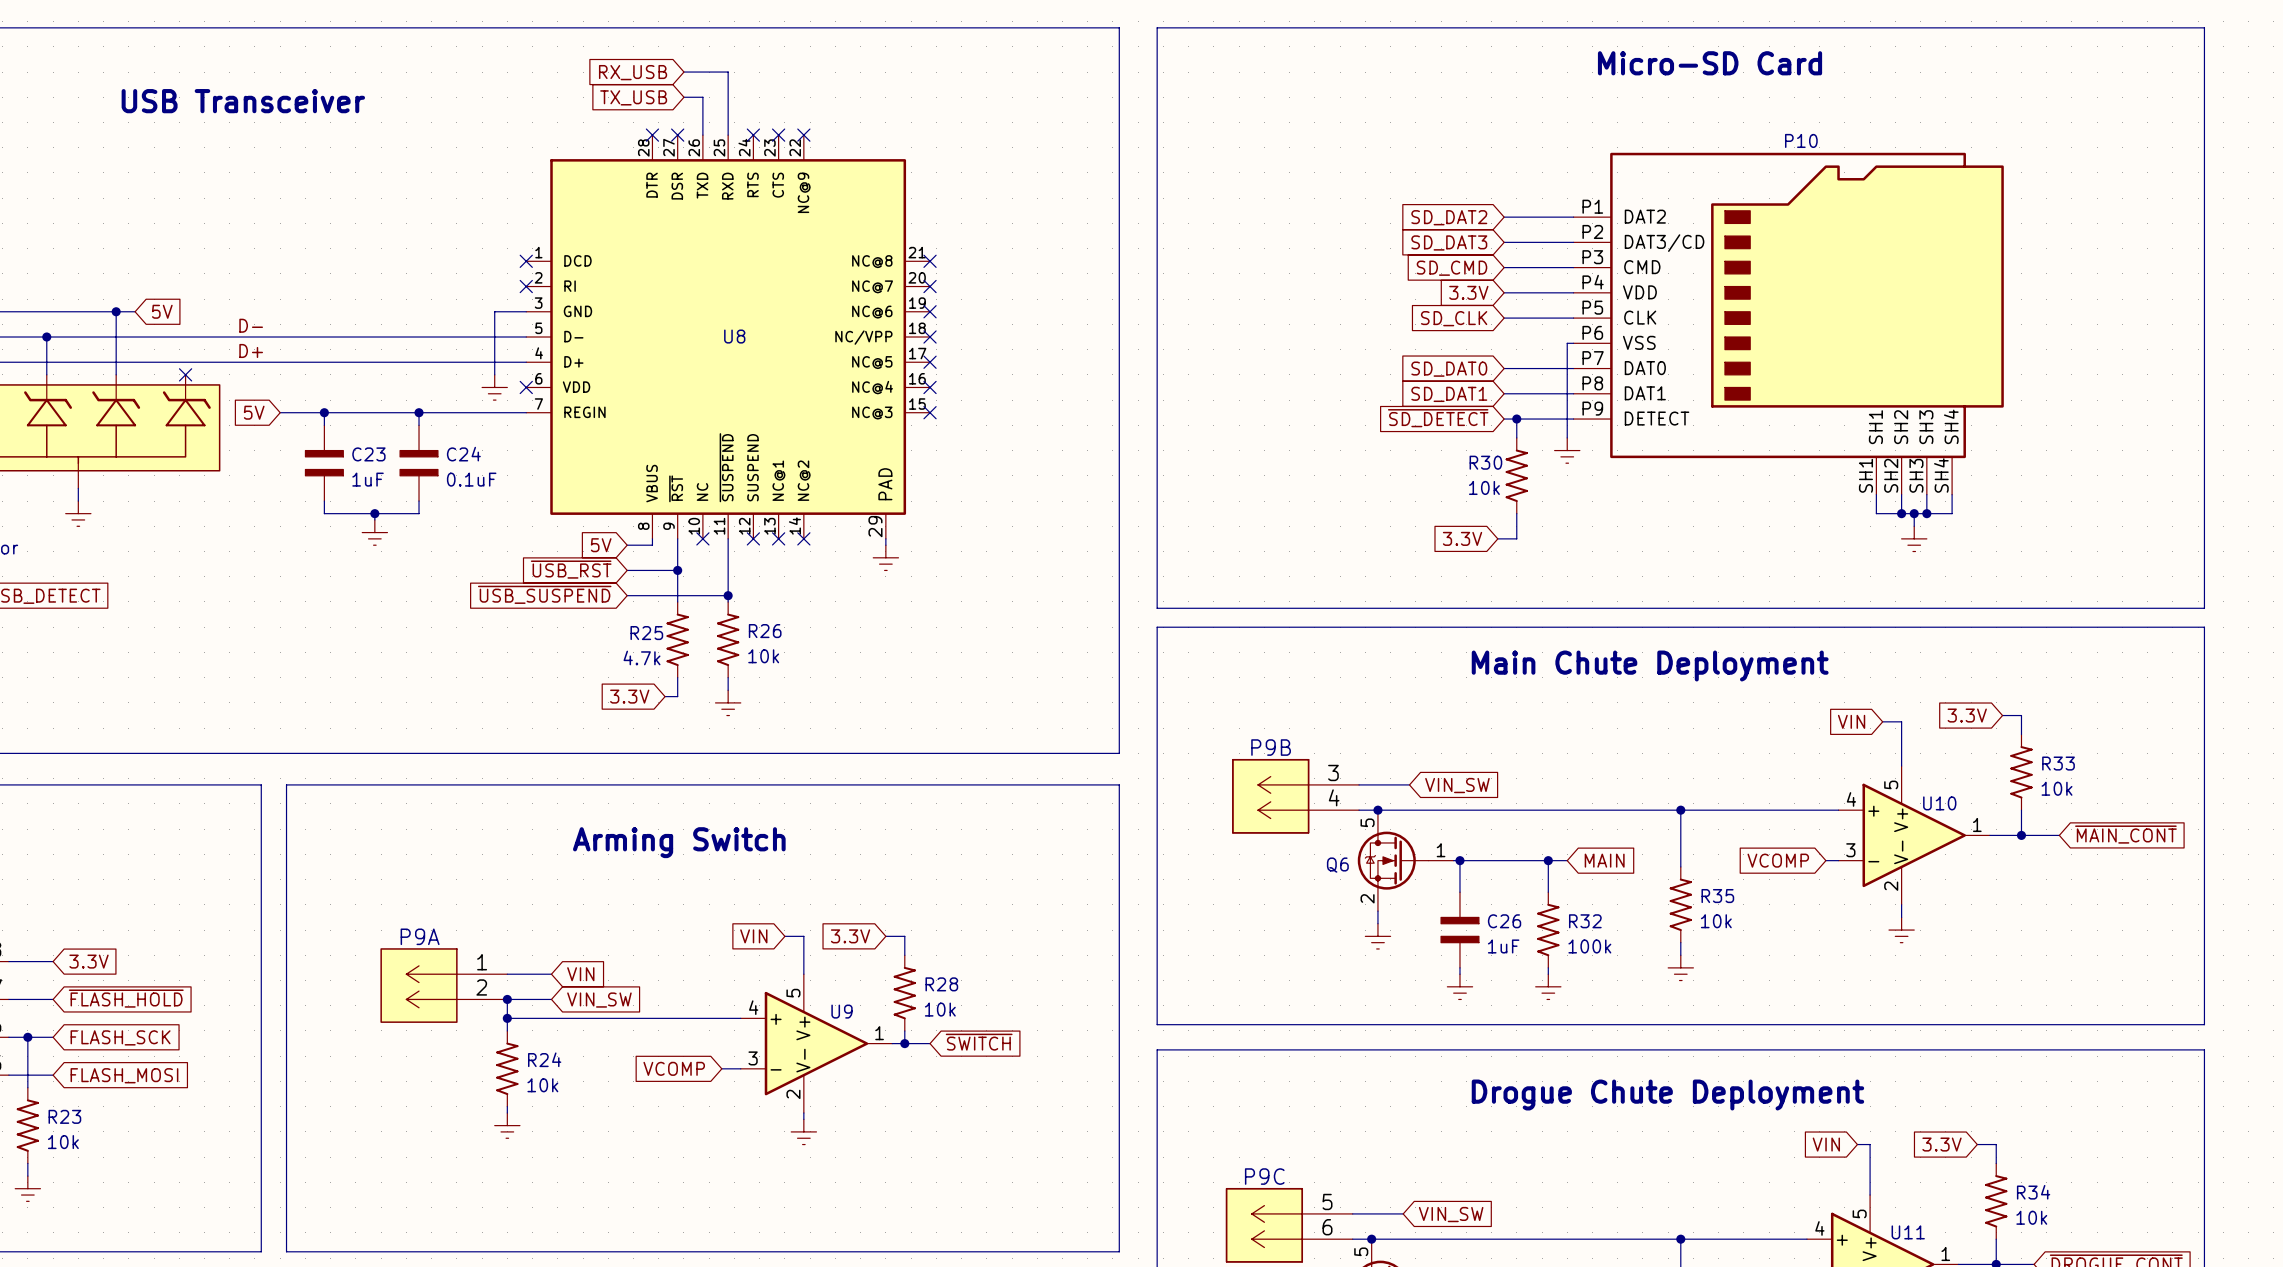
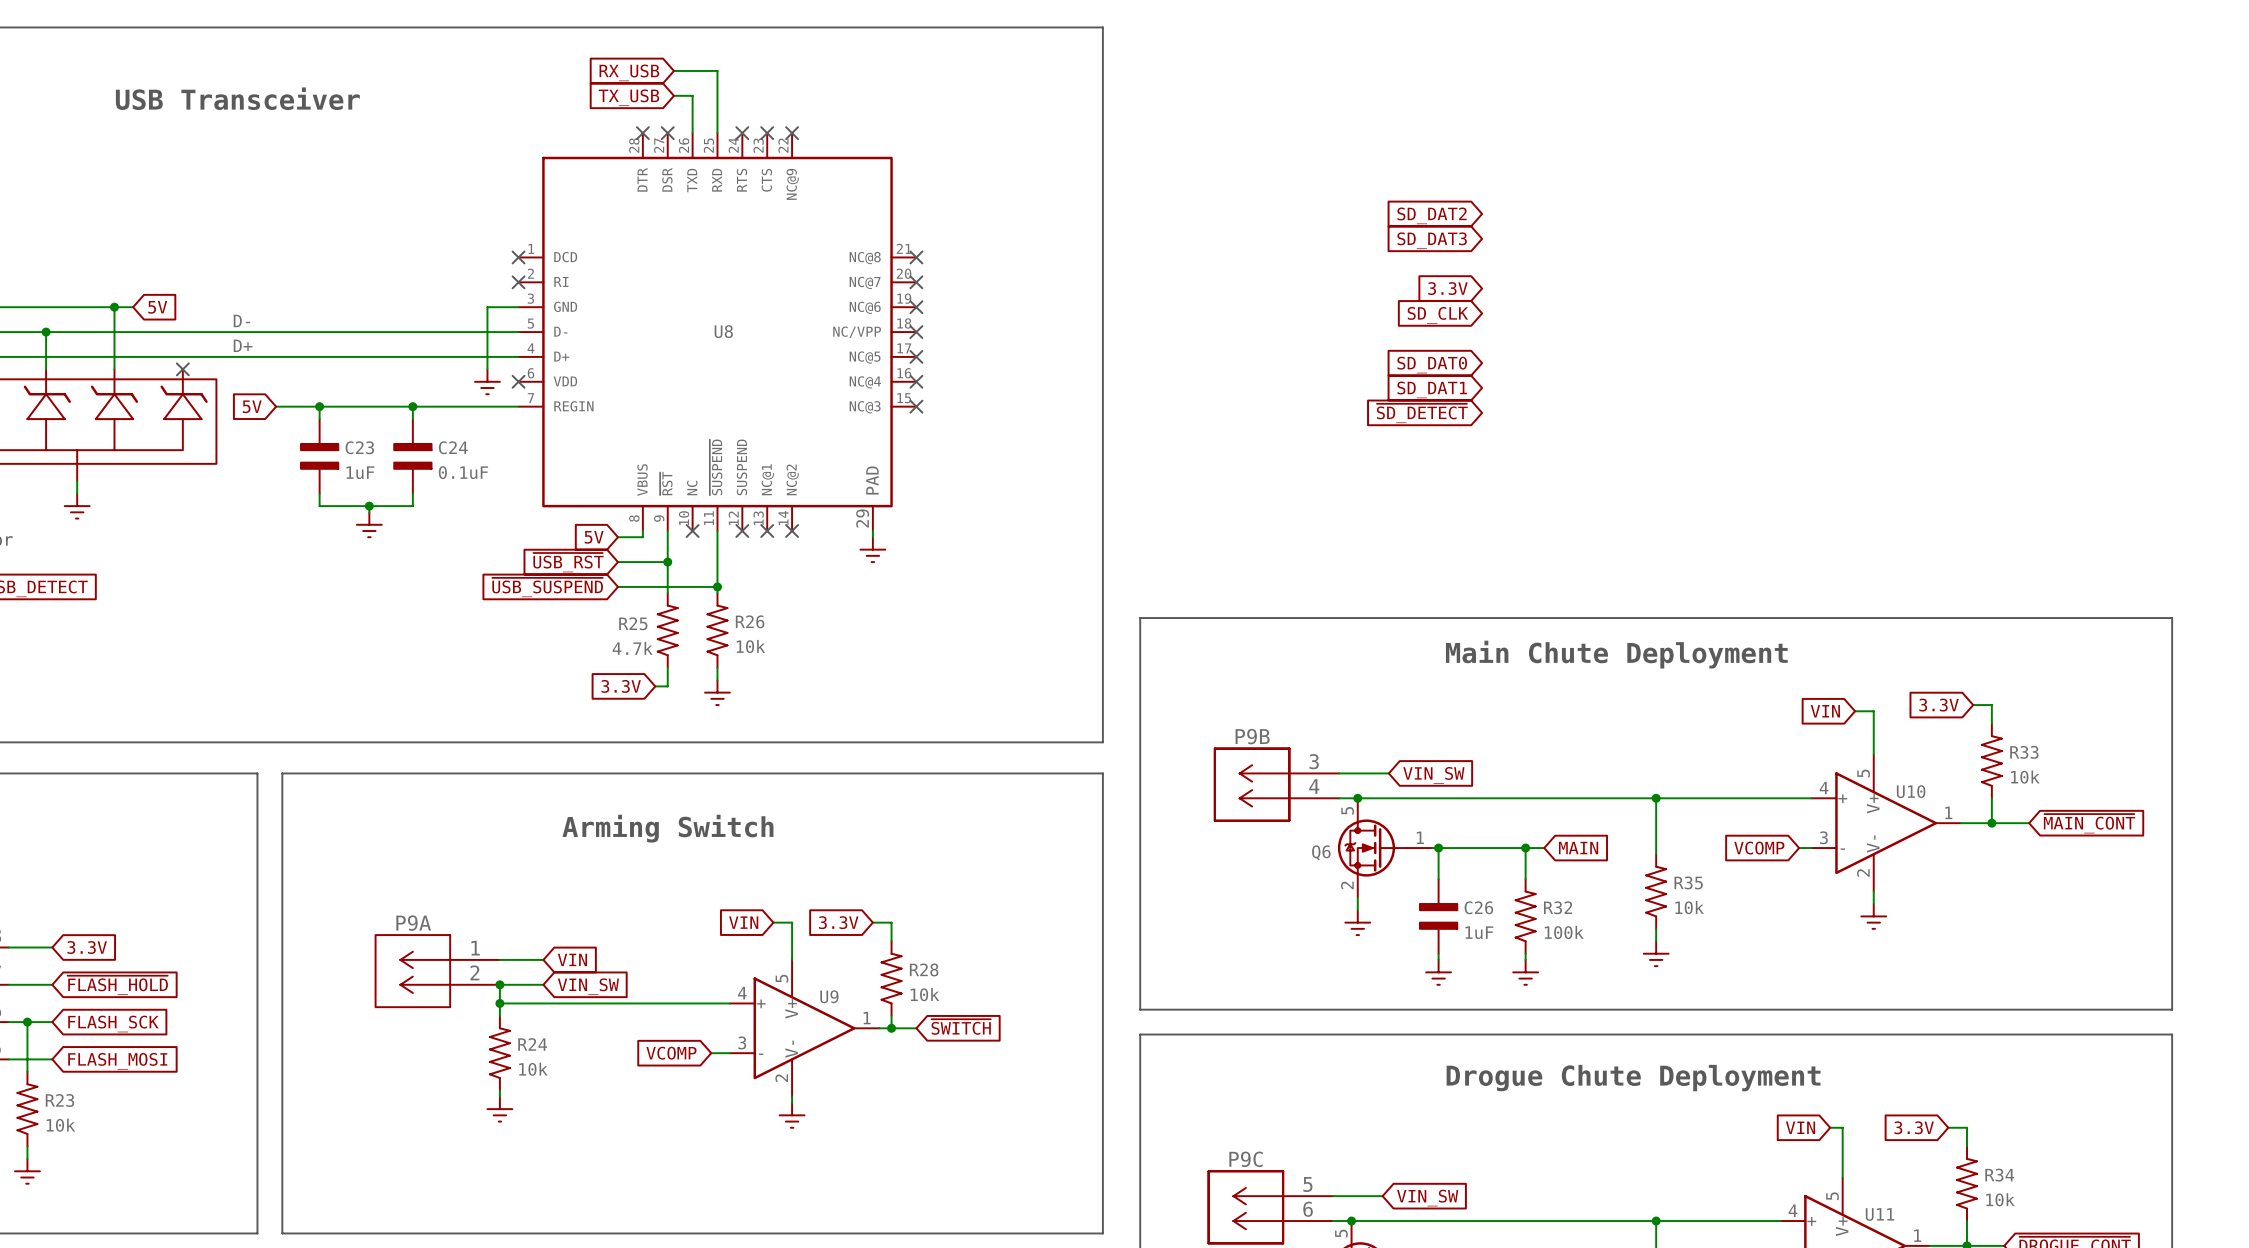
line: (1157, 27) (2204, 27) (2204, 608) (1157, 608) (1157, 27) -> none
text: Micro-SD Card (1710, 63) -> none
wire: (1504, 217) (1573, 217) -> none
wire: (1504, 242) (1573, 242) -> none
wire: (1504, 267) (1573, 267) -> none
global label: SD_CMD (1452, 268) -> none
wire: (1504, 292) (1573, 292) -> none
wire: (1504, 318) (1573, 318) -> none
P10: (1788, 323) -> none
wire: (1573, 343) (1567, 343) (1567, 437) -> none
wire: (1504, 368) (1573, 368) -> none
wire: (1504, 393) (1573, 393) -> none
wire: (1504, 419) (1573, 419) -> none
wire: (1516, 419) (1516, 437) -> none
junction: (1516, 419) -> none
power symbol: (1567, 450) -> none
R30: 10k (1516, 475) -> none
wire: (1876, 494) (1876, 513) (1952, 513) (1952, 494) -> none
wire: (1901, 494) (1901, 513) -> none
wire: (1926, 494) (1926, 513) -> none
wire: (1516, 513) (1516, 538) (1497, 538) -> none
junction: (1901, 513) -> none
wire: (1914, 513) (1914, 526) -> none
junction: (1914, 513) -> none
junction: (1926, 513) -> none
global label: 3.3V (1462, 538) -> none
power symbol: (1914, 538) -> none

